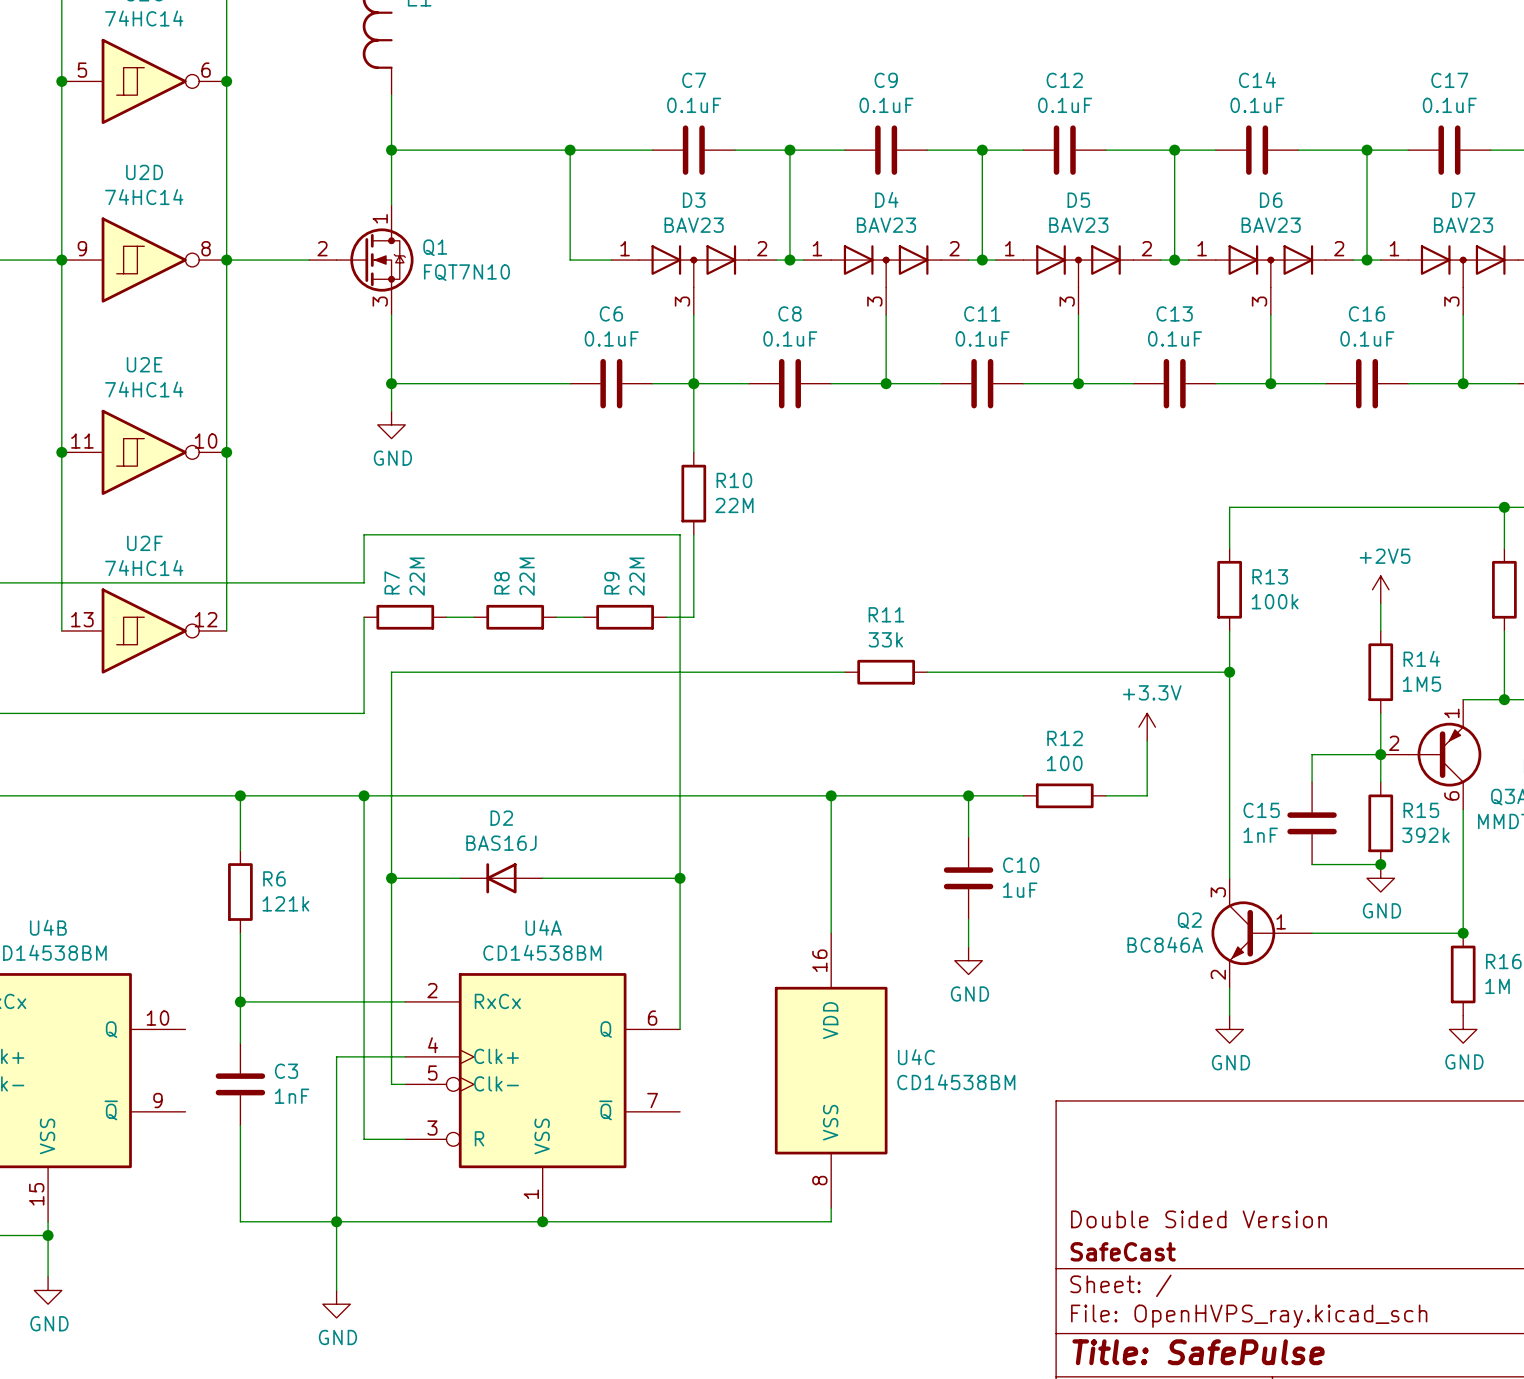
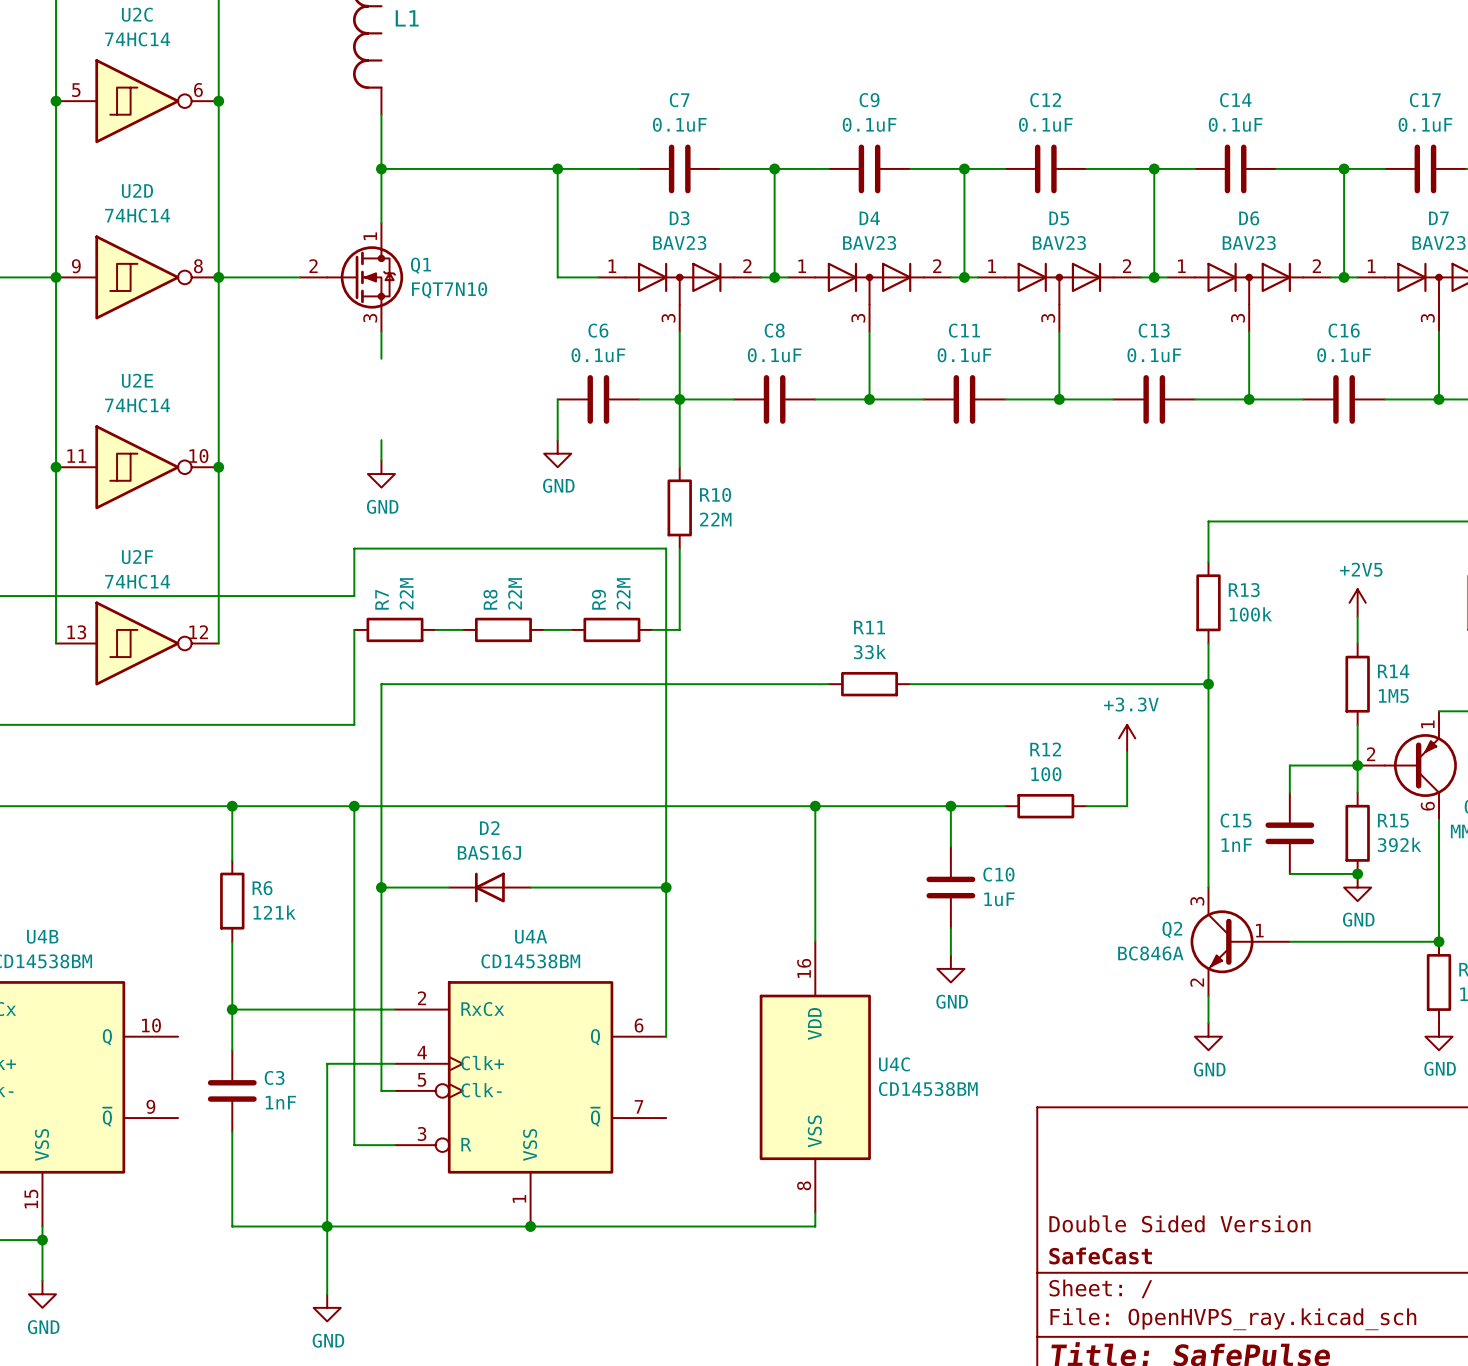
wire: (391, 342) (391, 411) -> none
wire: (391, 383) (570, 383) -> (557, 440) (557, 399)
junction: (391, 383) -> none
wire: none -> (381, 440) (381, 460)
power symbol position: GND (391, 424) -> GND (381, 474)
power symbol: none -> GND (557, 453)

